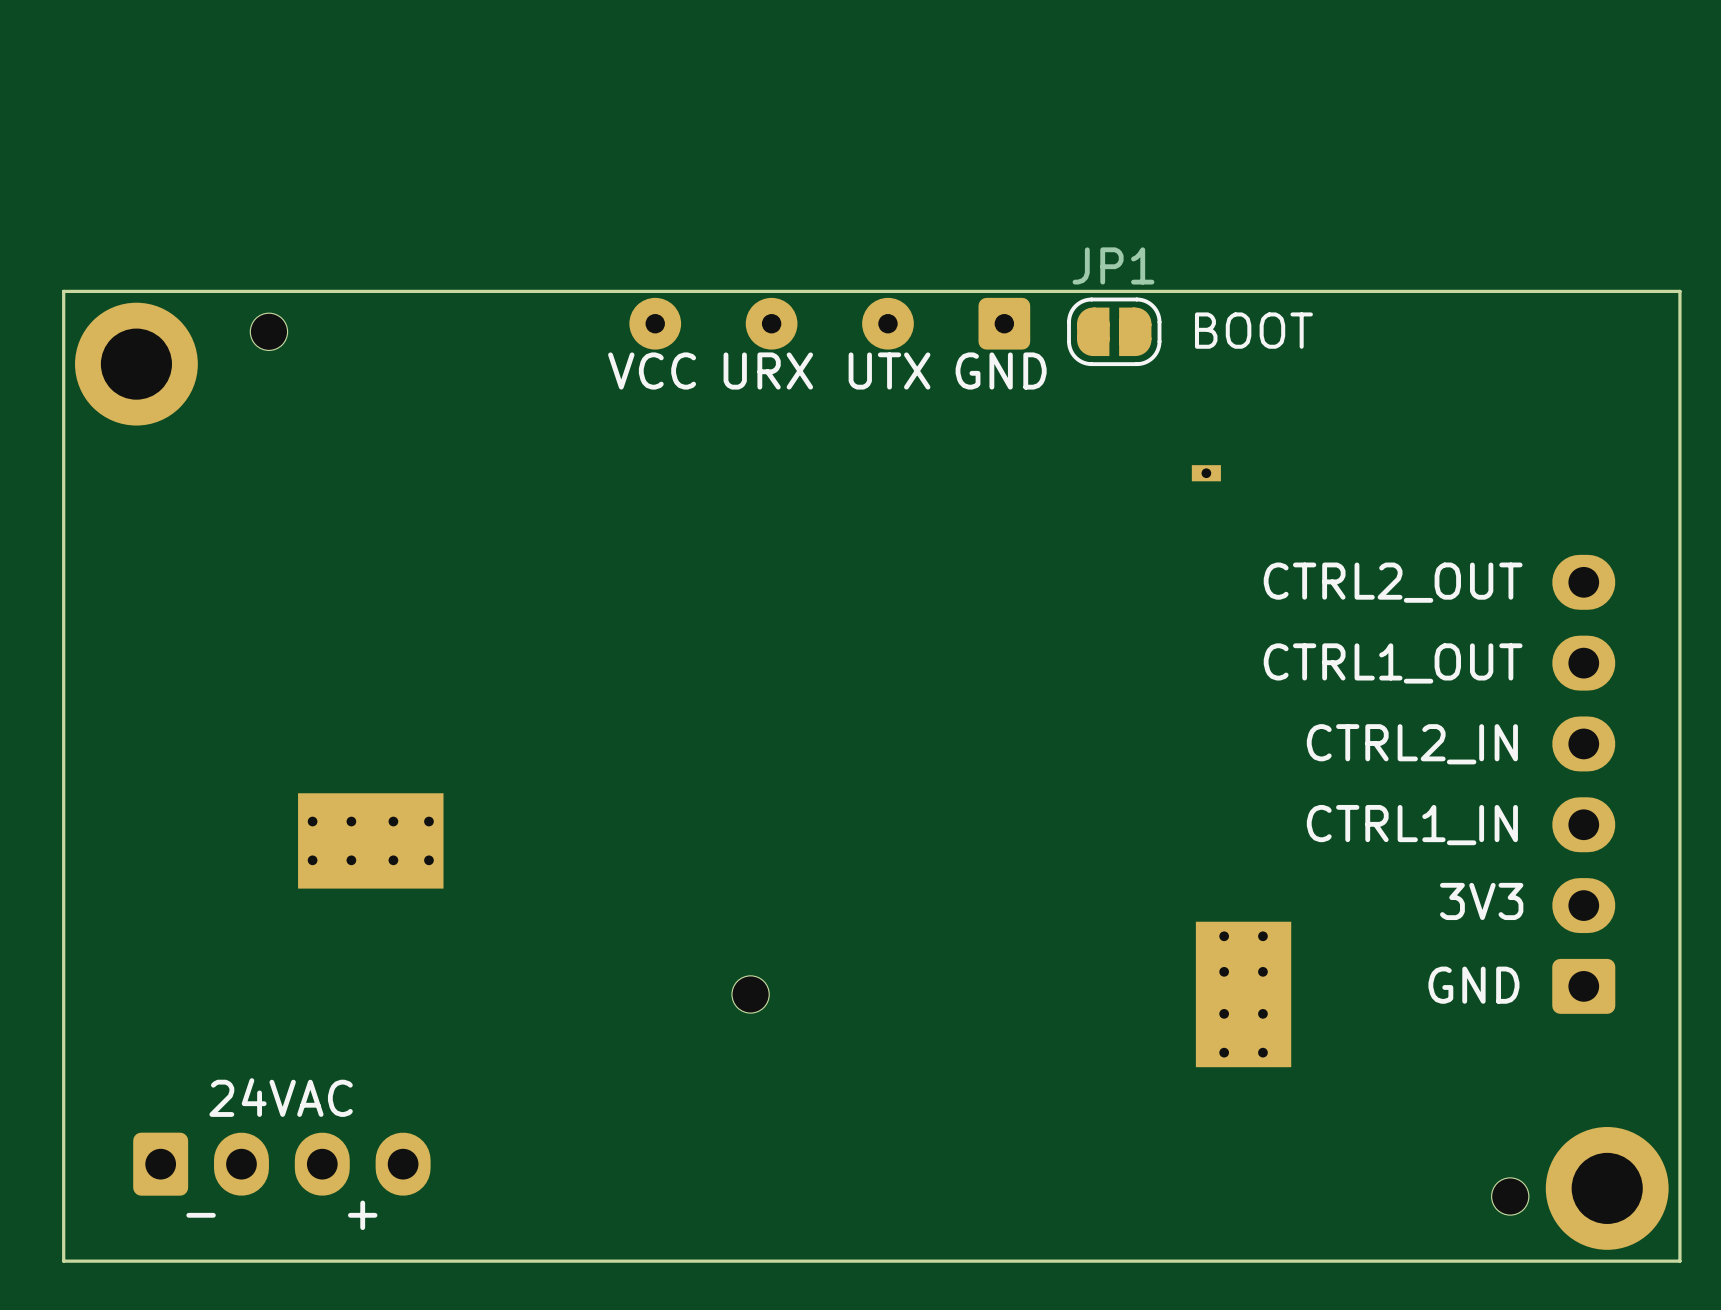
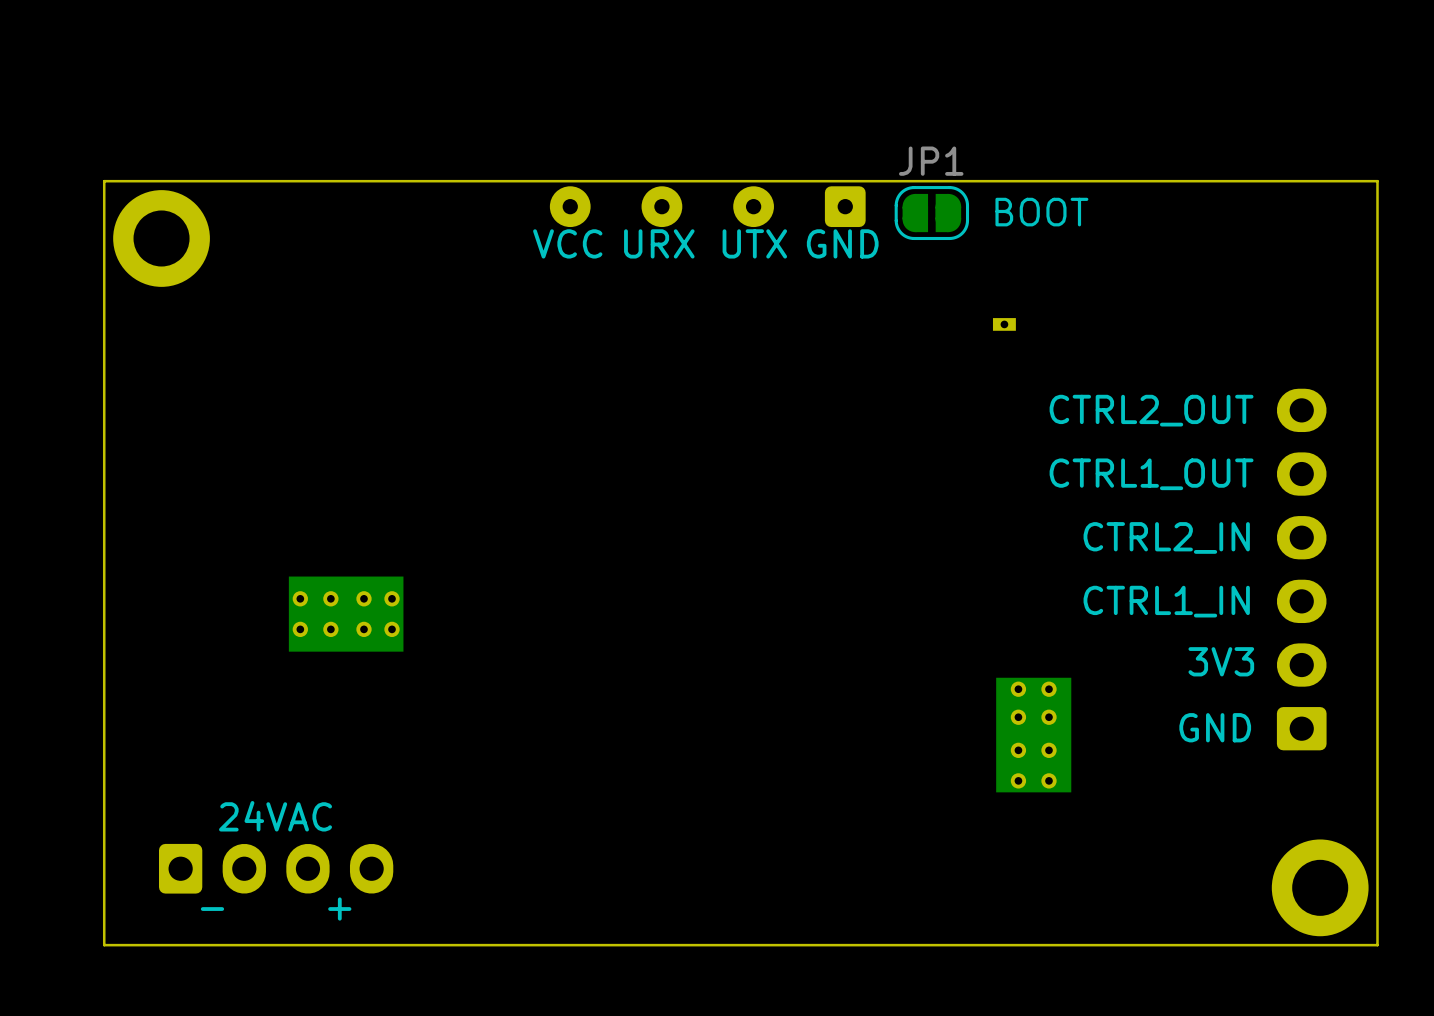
part: (268, 331) -> none
part: (750, 994) -> none
part: (1510, 1196) -> none

